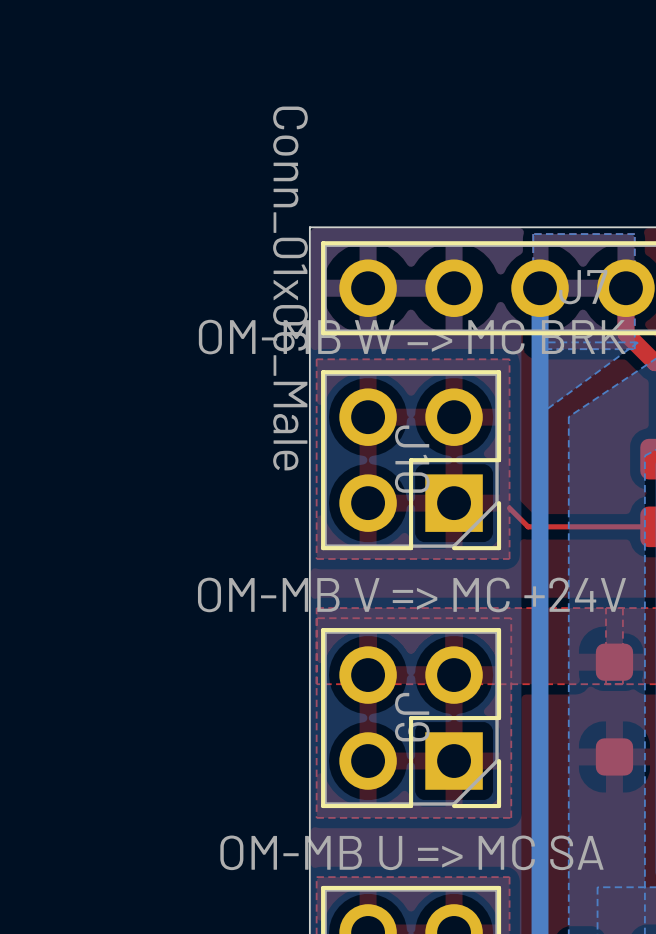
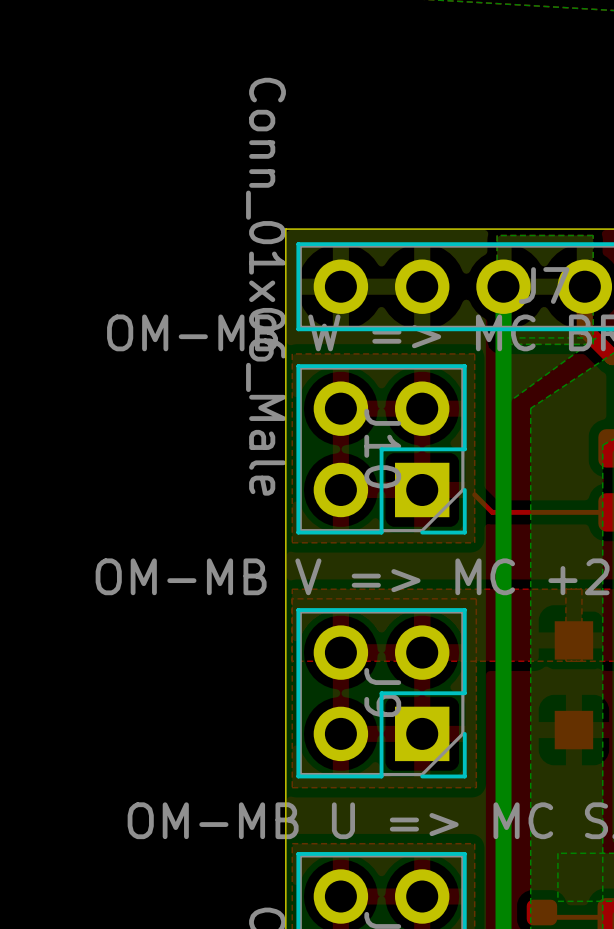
part footprint: [595, 643, 634, 776] -> [554, 621, 594, 750]

